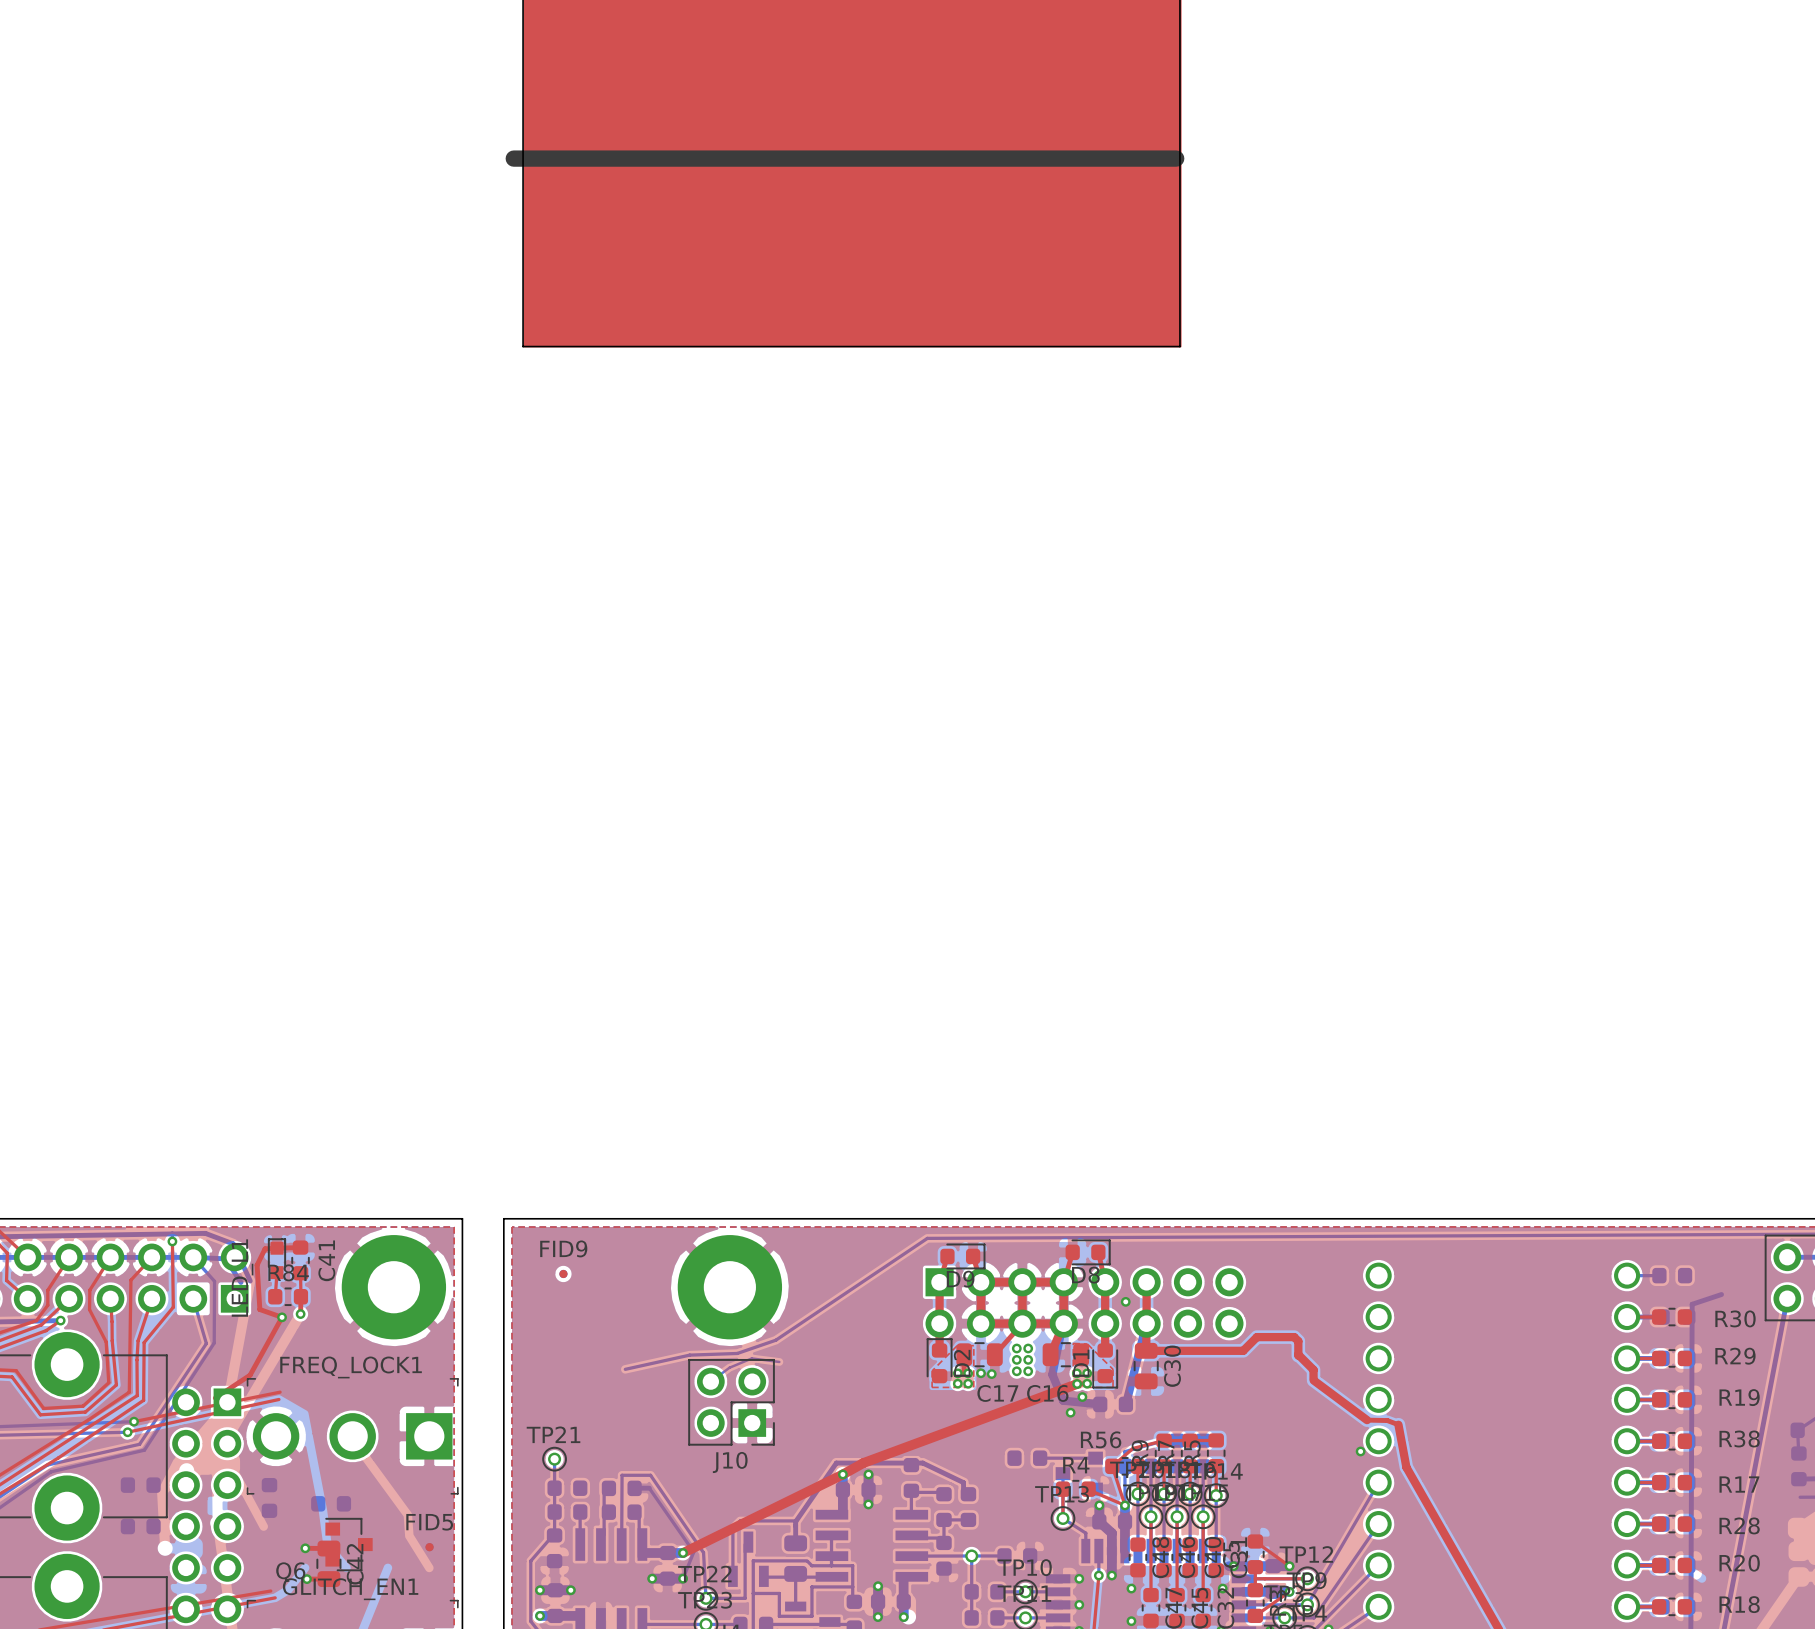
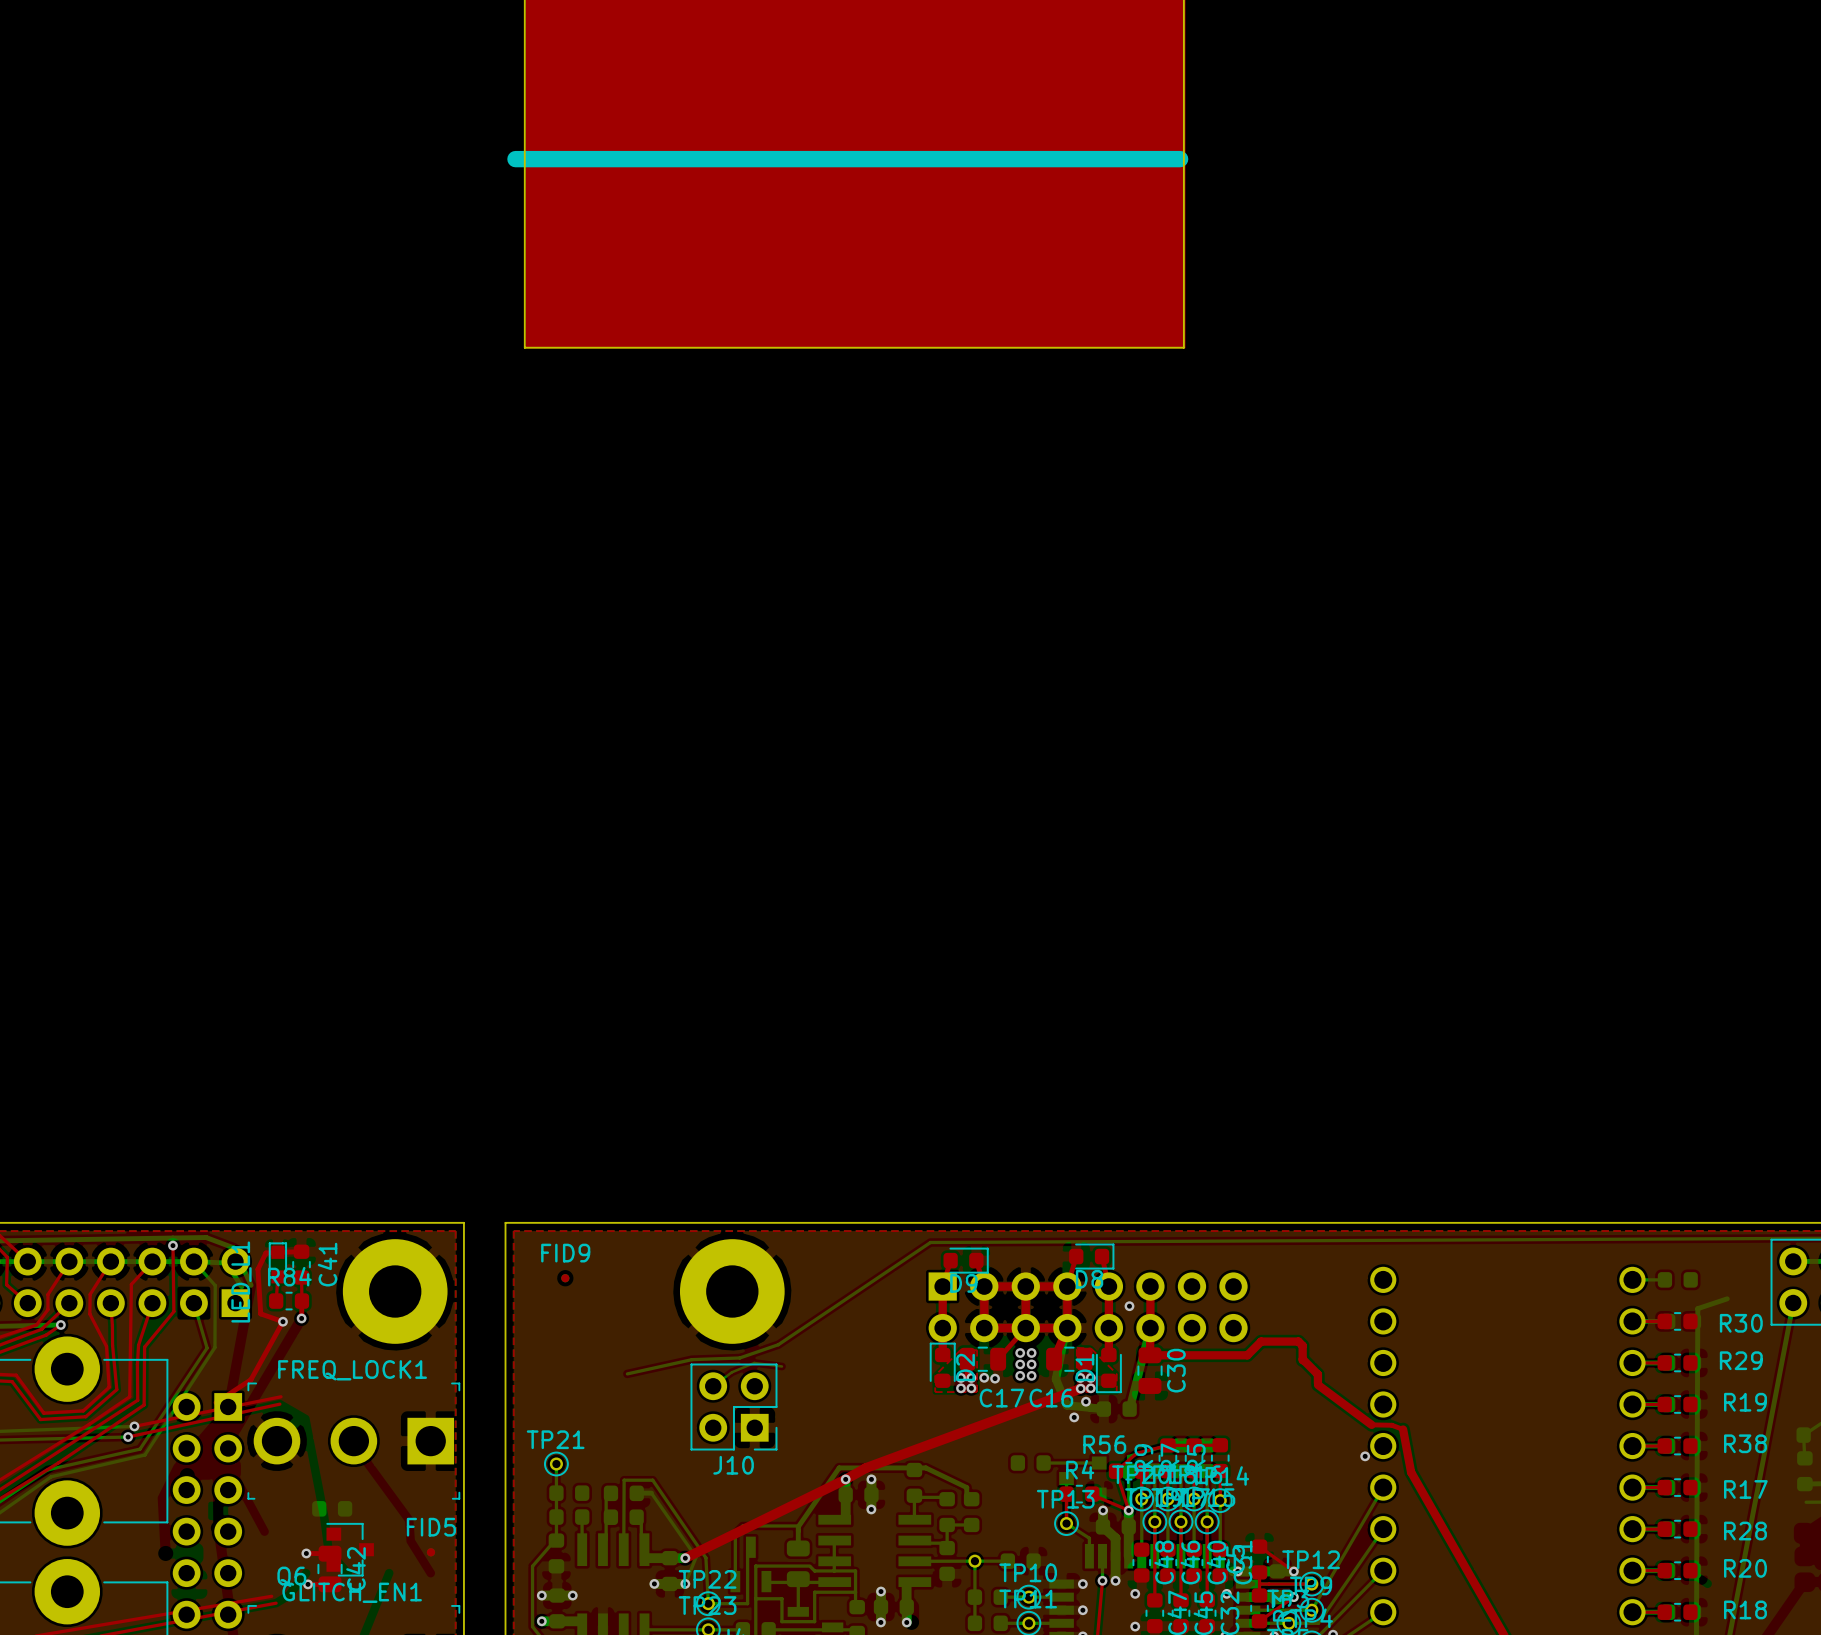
part: (140, 1485) -> none
part: (269, 1497) -> none
part: (140, 1526) -> none

